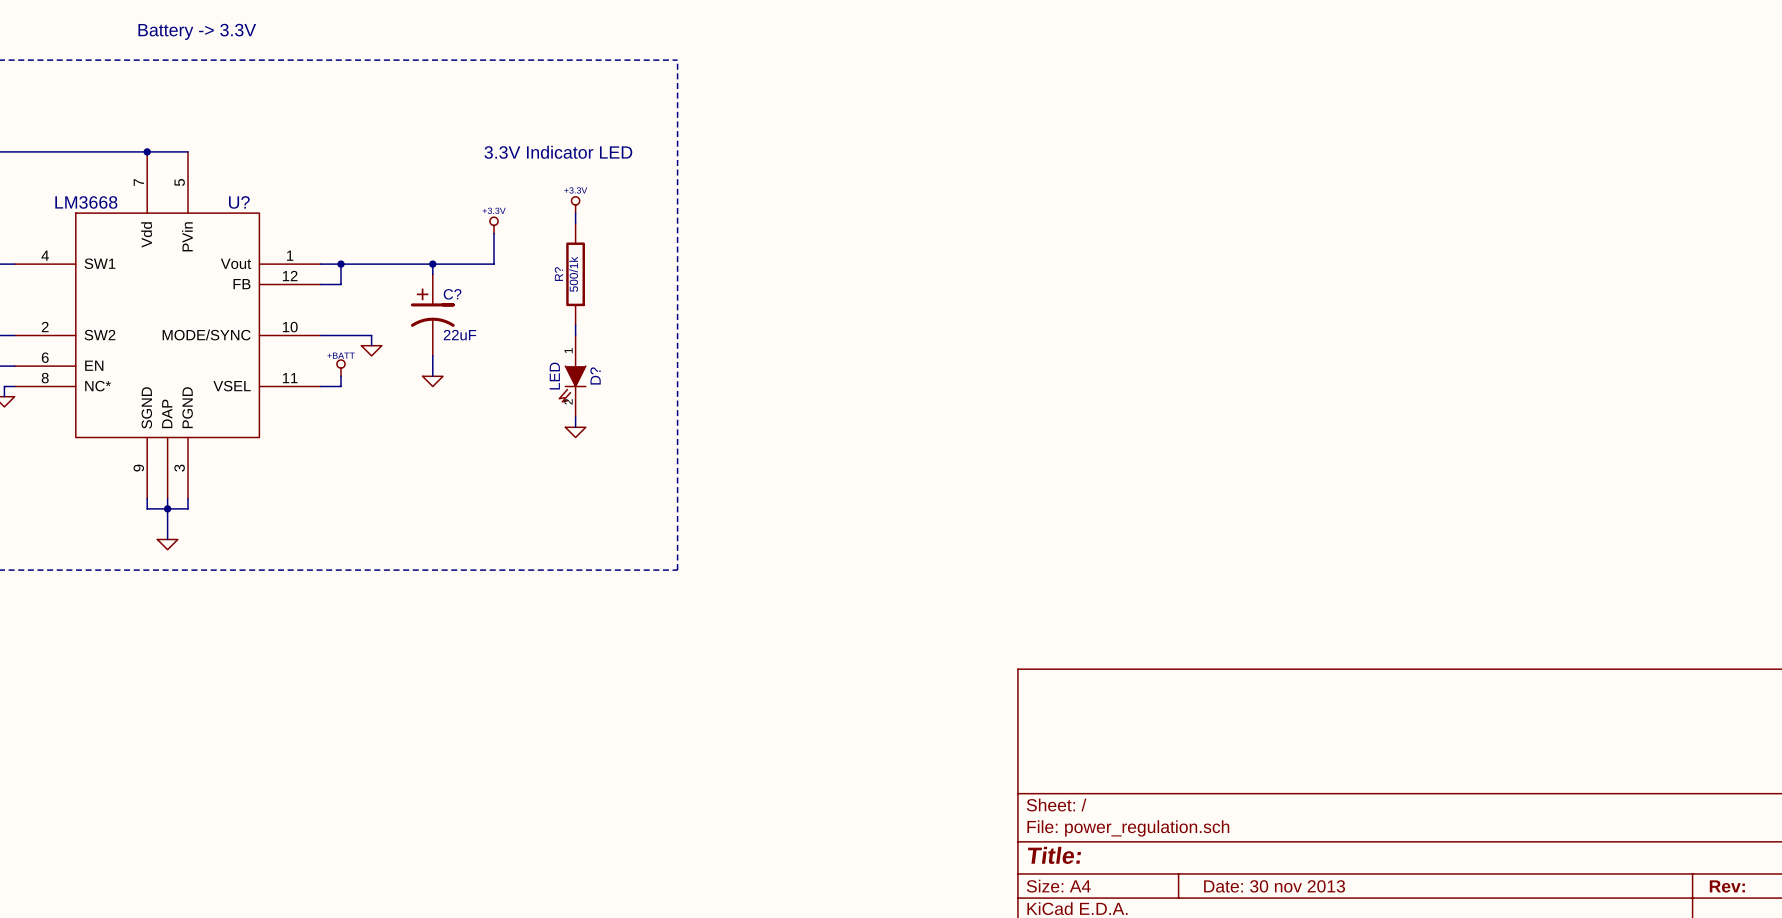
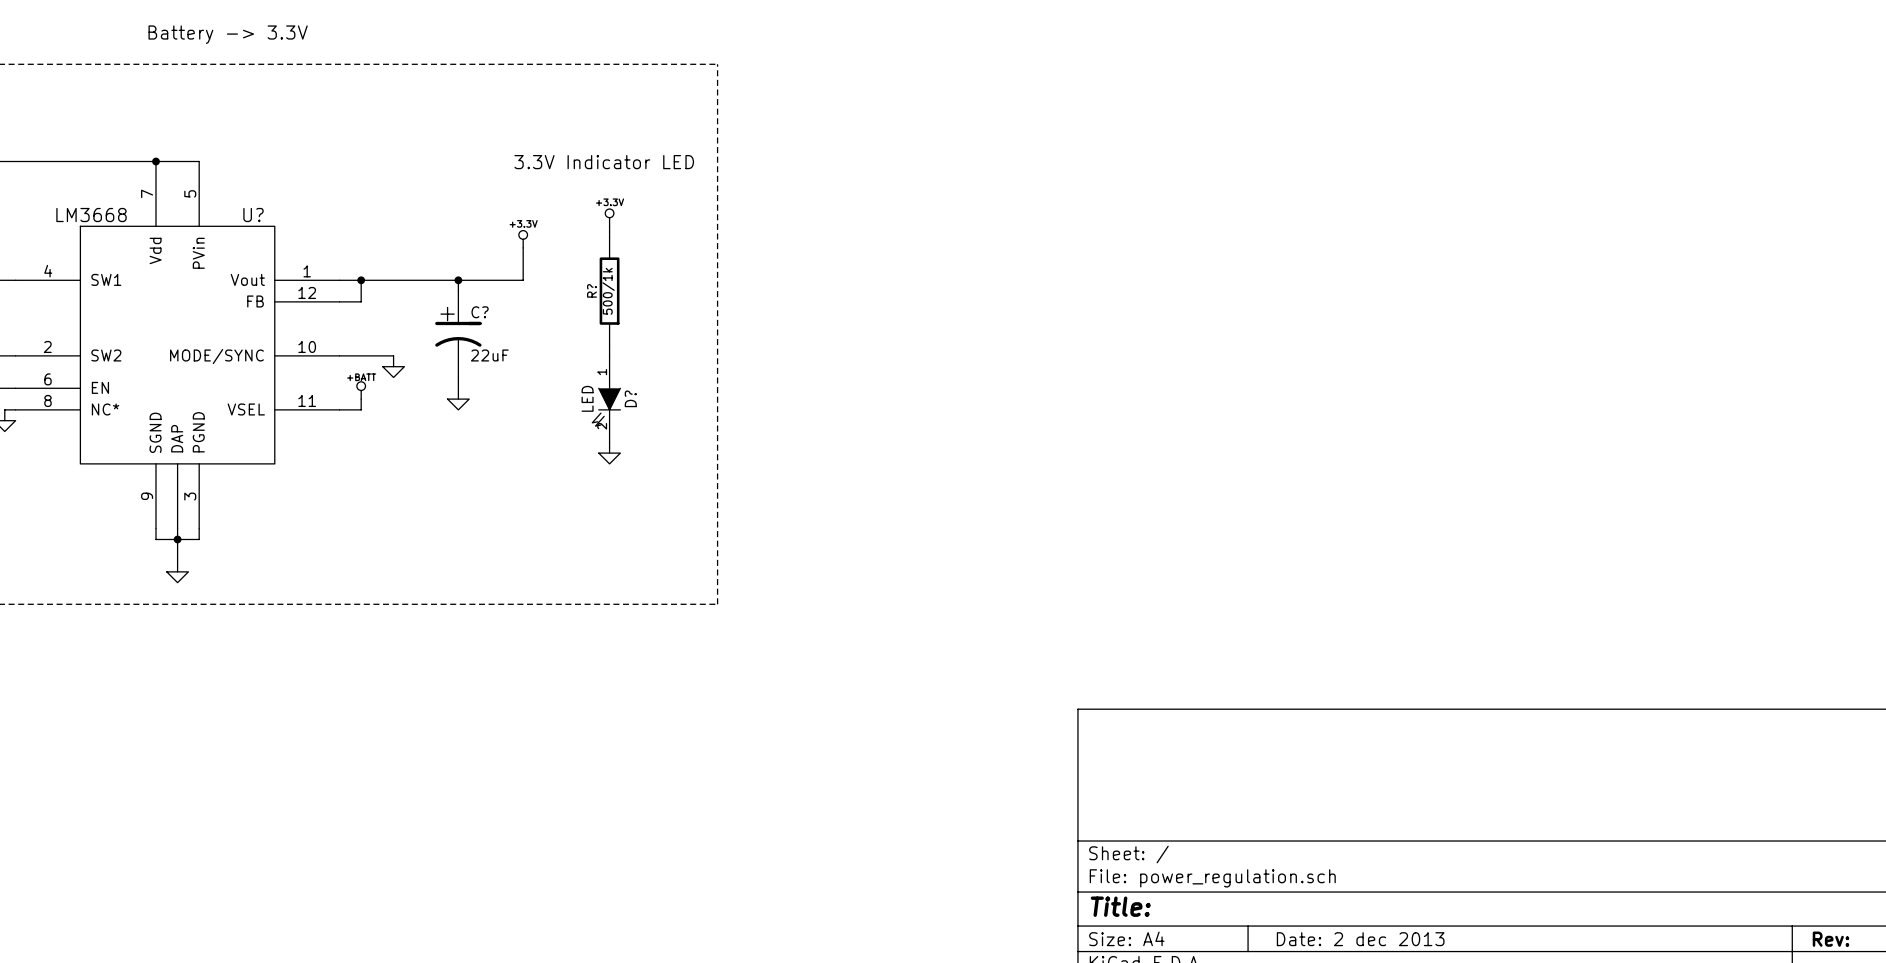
title block: Date: 30 nov 2013 (1274, 886) -> Date: 2 dec 2013 (1360, 939)

